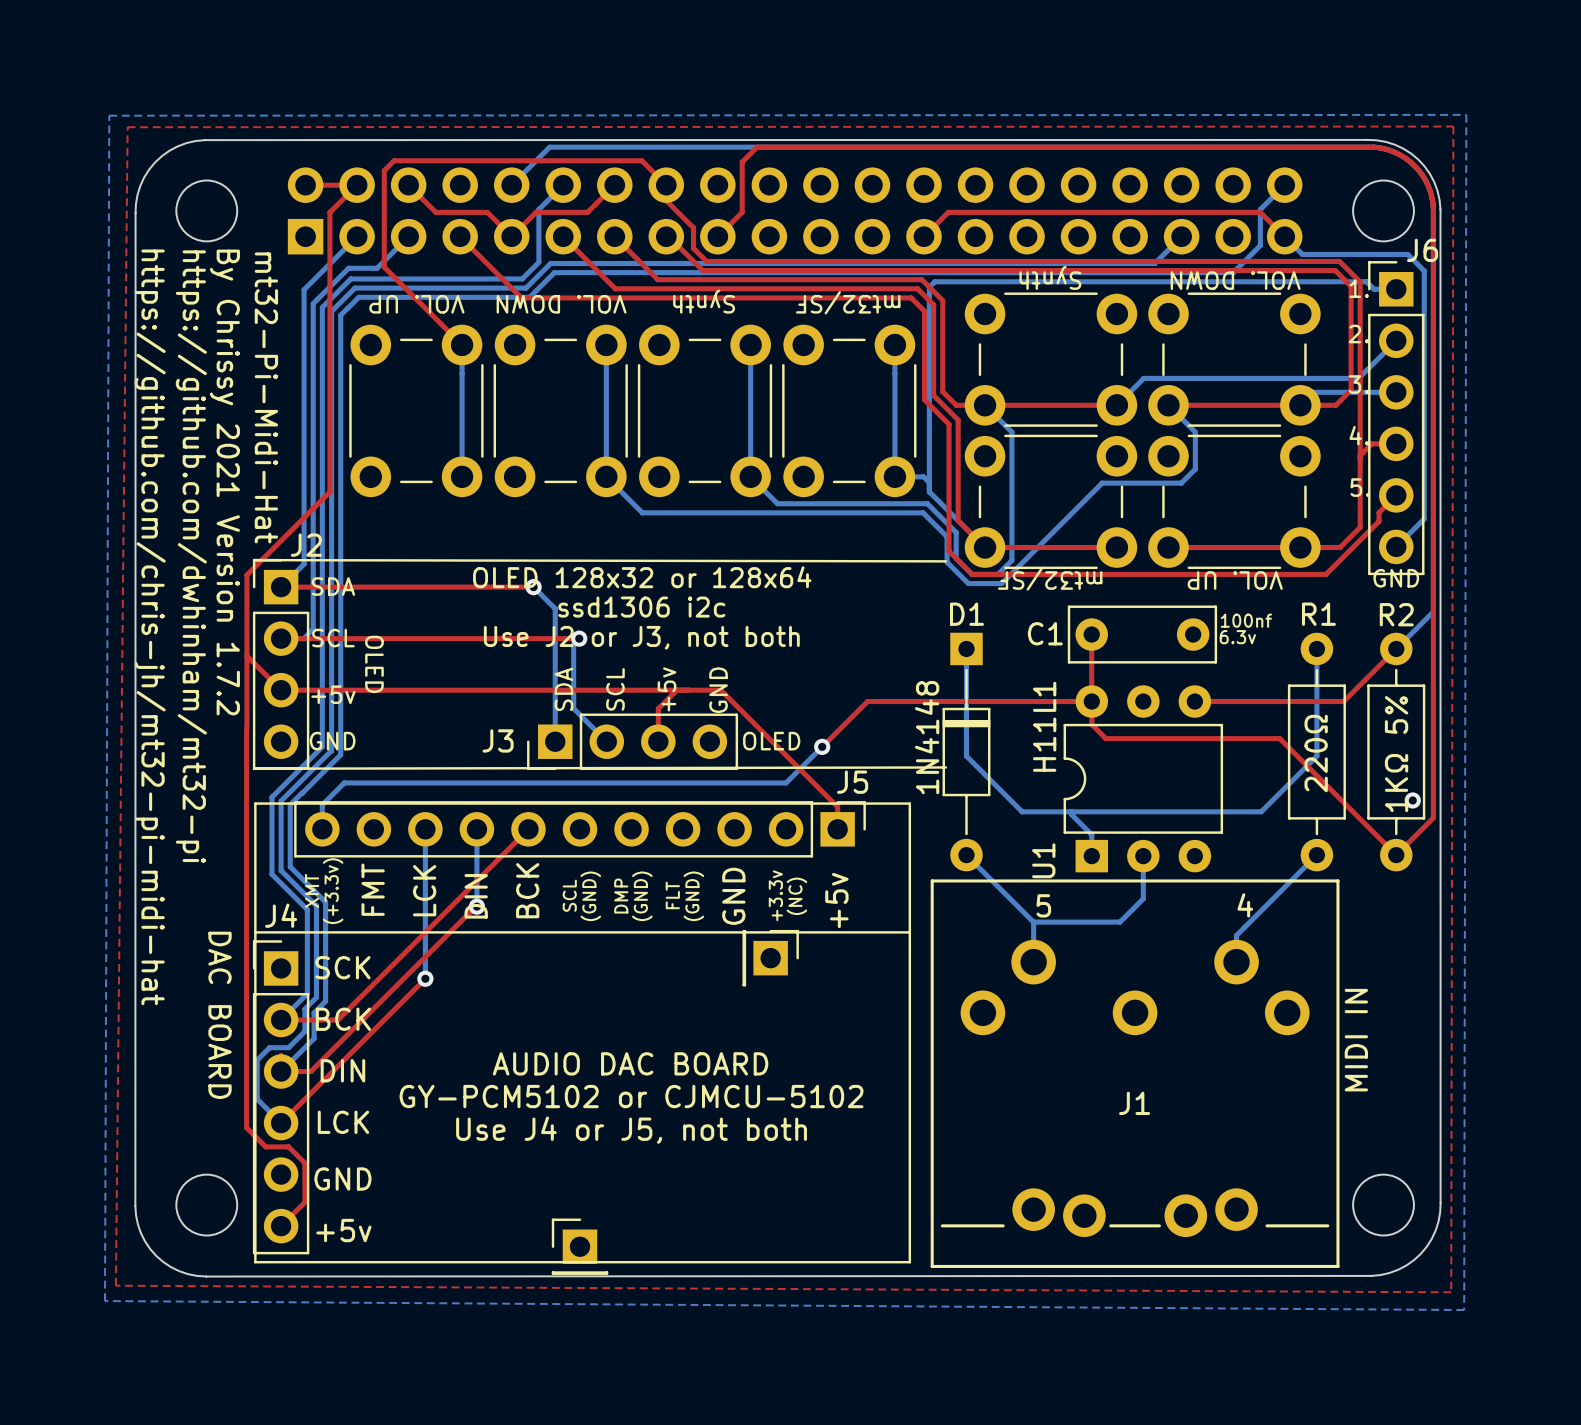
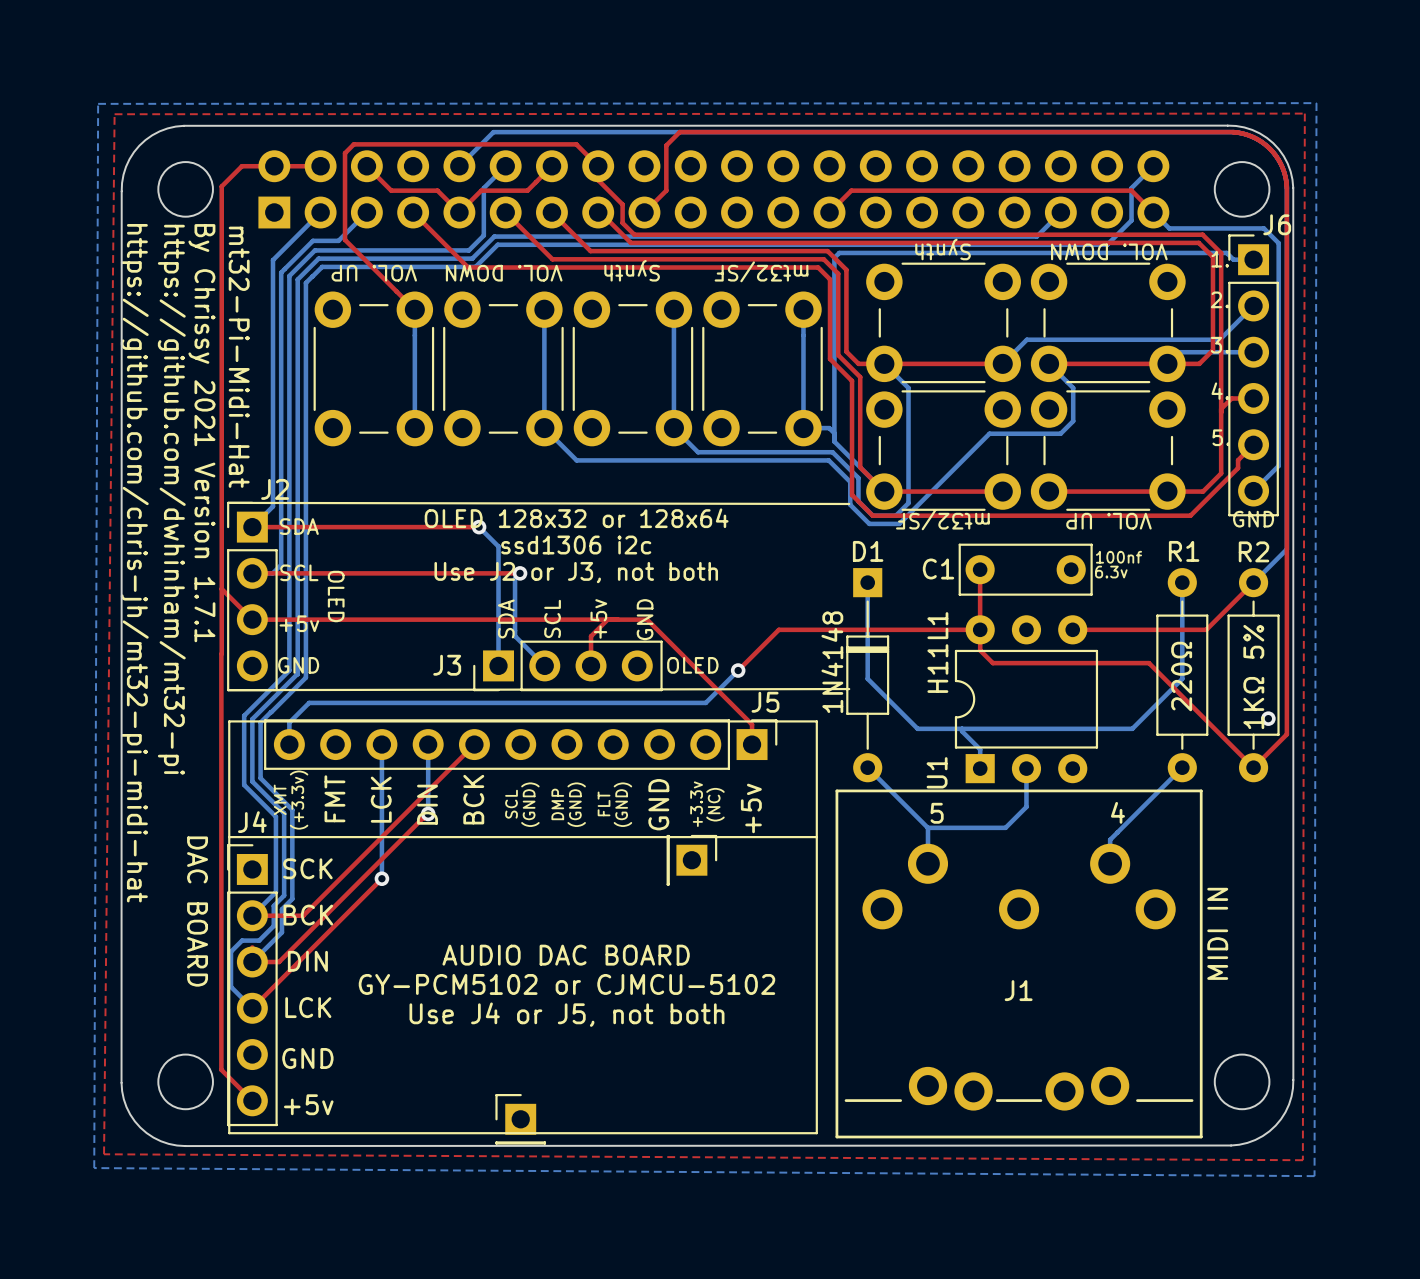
top track: (357, 185) (329, 212) (329, 491) (246, 574) -> (274, 166) (241, 166) (221, 186) (221, 516)
text: By Chrissy 2021 Version 1.7.2 (224, 482) -> By Chrissy 2021 Version 1.7.1 (201, 433)
top track: (246, 1127) (265, 1146) (288, 1146) (304, 1163) (304, 1202) (281, 1226) -> (221, 1012) (221, 1069) (252, 1100)

